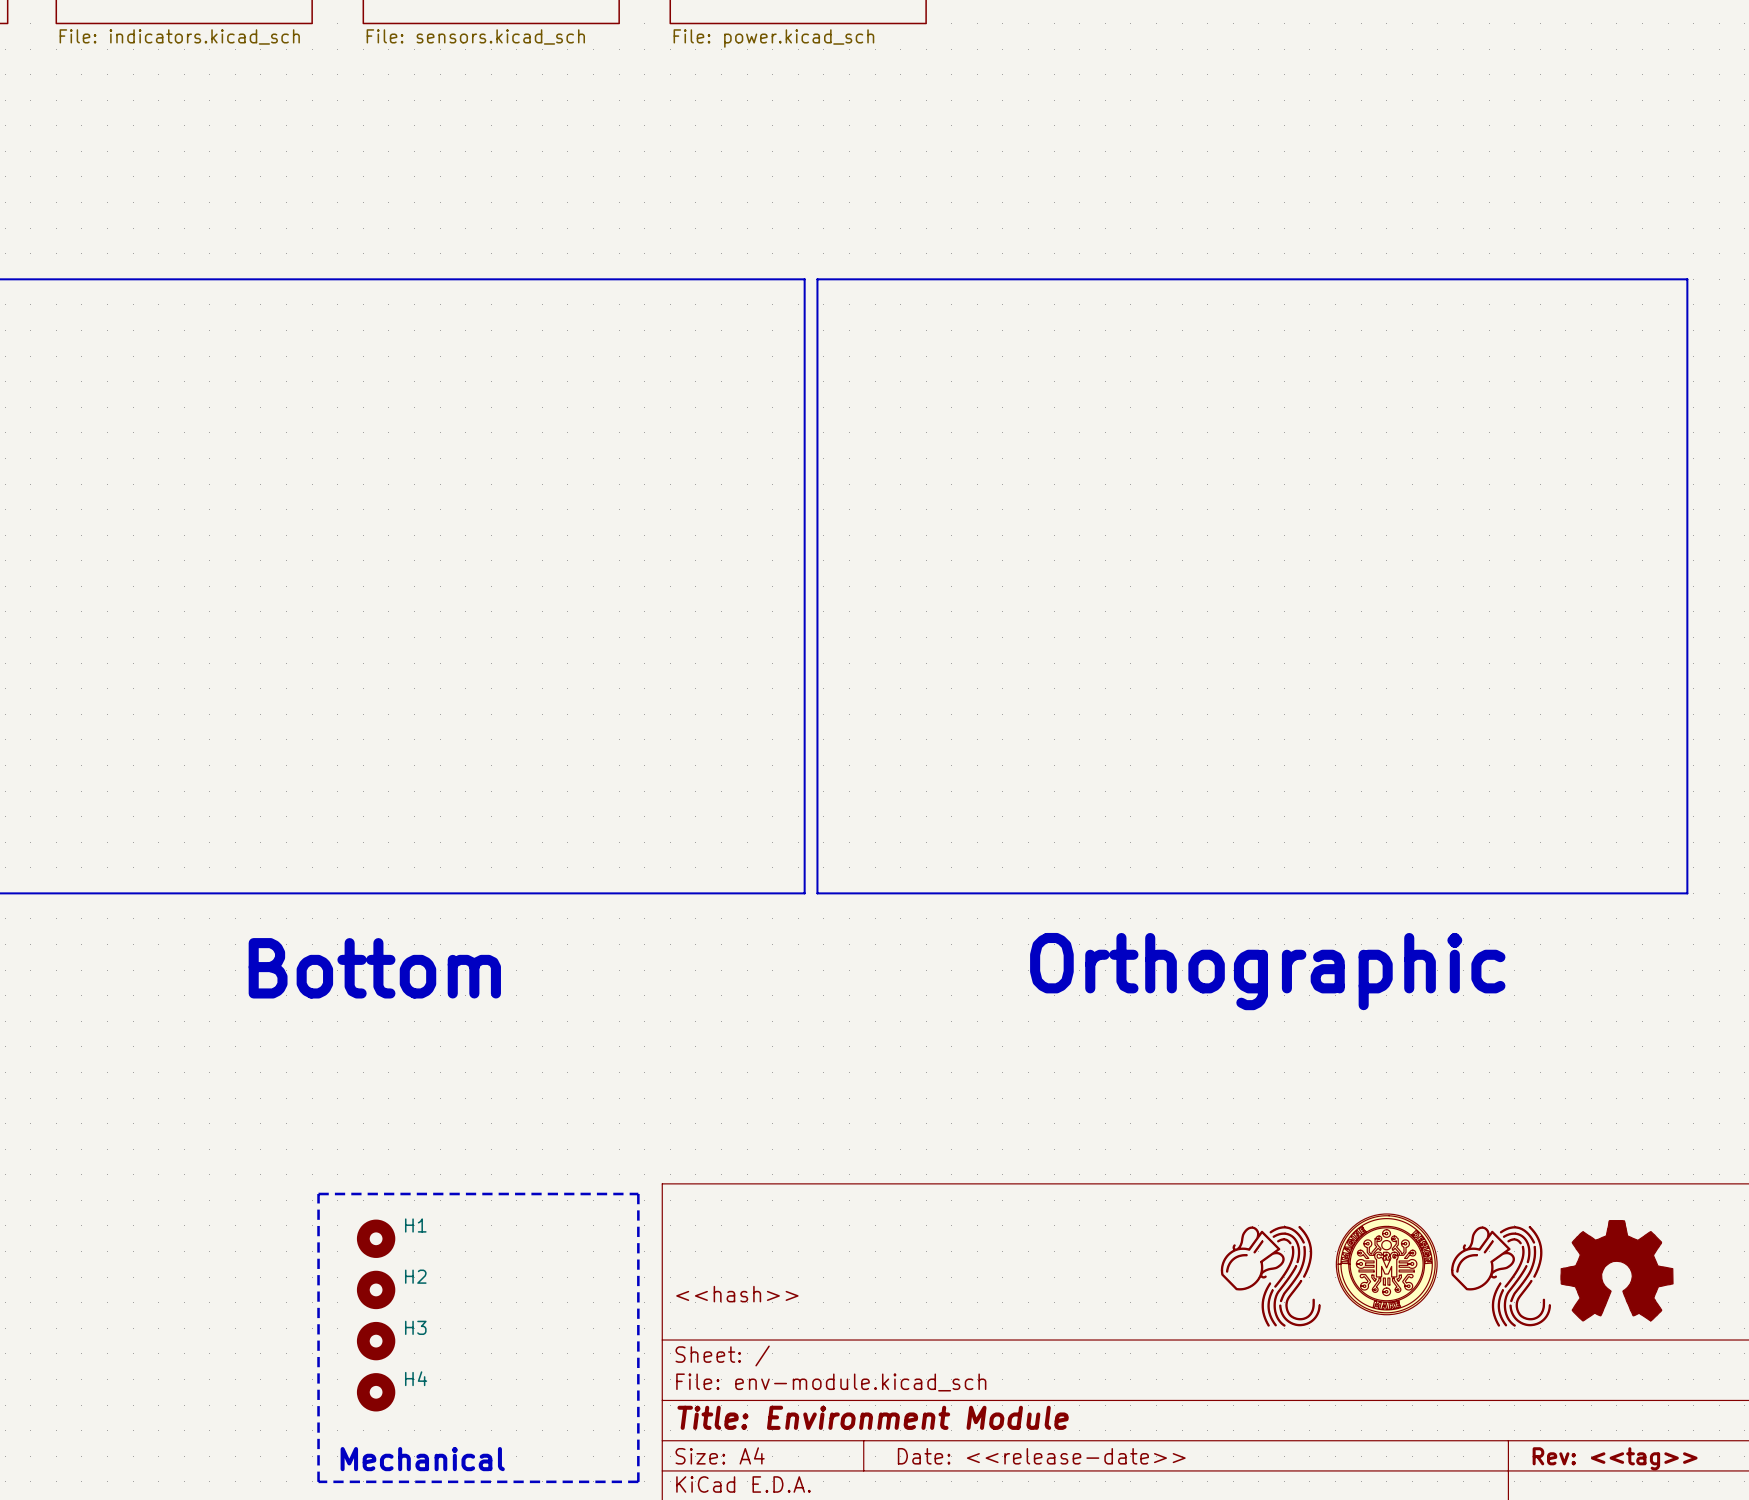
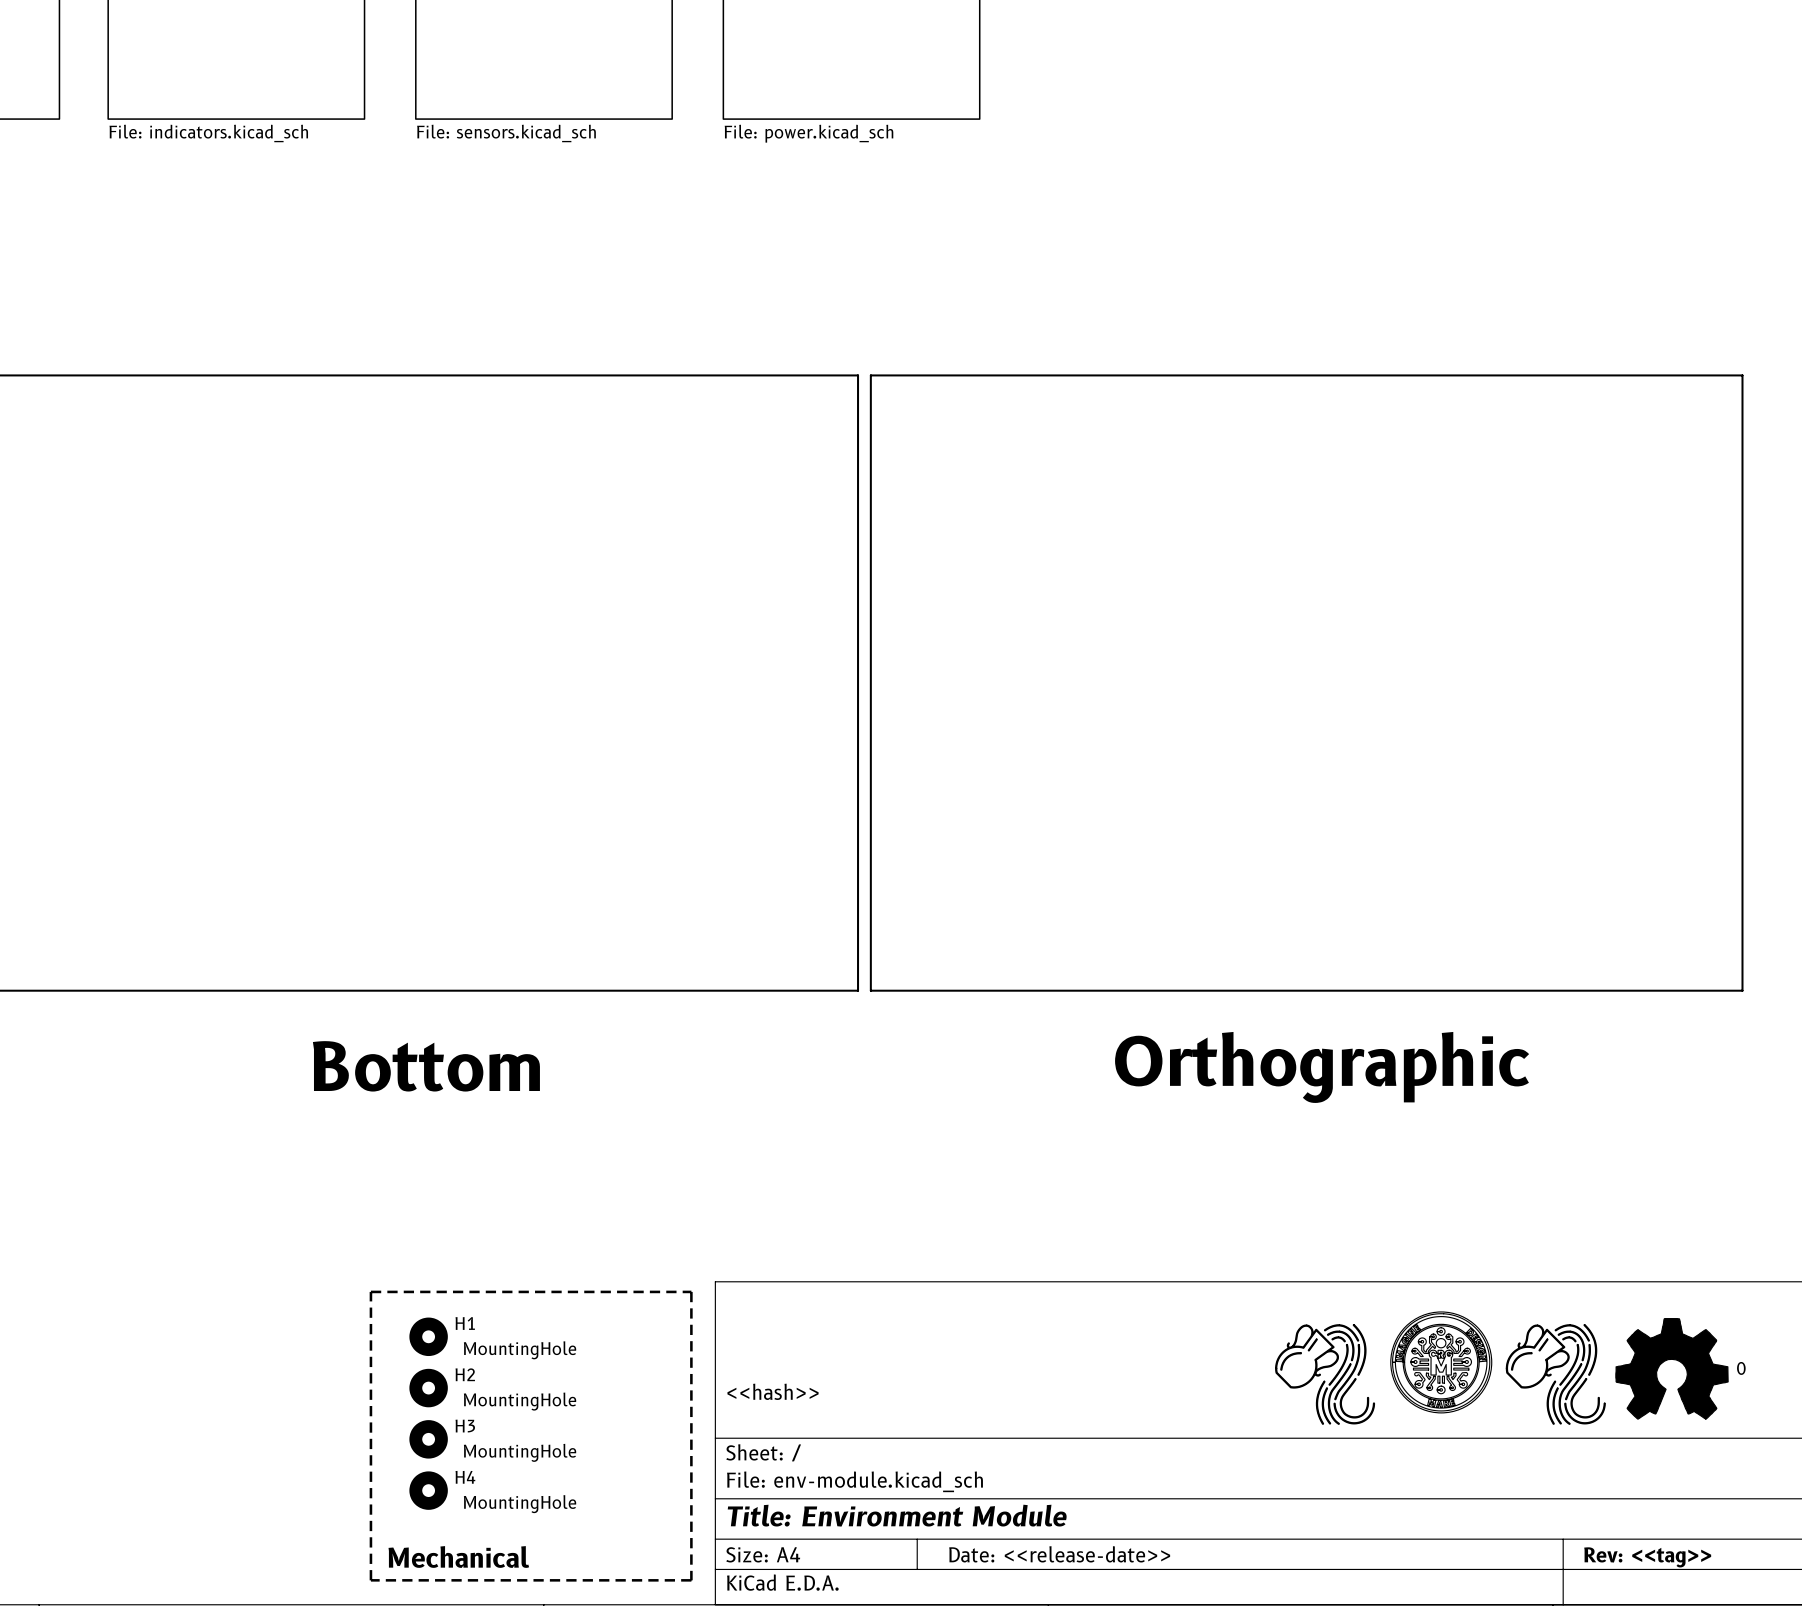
H1 value: none -> MountingHole (520, 1350)
part text: none -> 0 (1741, 1368)
H2 value: none -> MountingHole (520, 1401)
H3 value: none -> MountingHole (520, 1452)
H4 value: none -> MountingHole (520, 1504)

